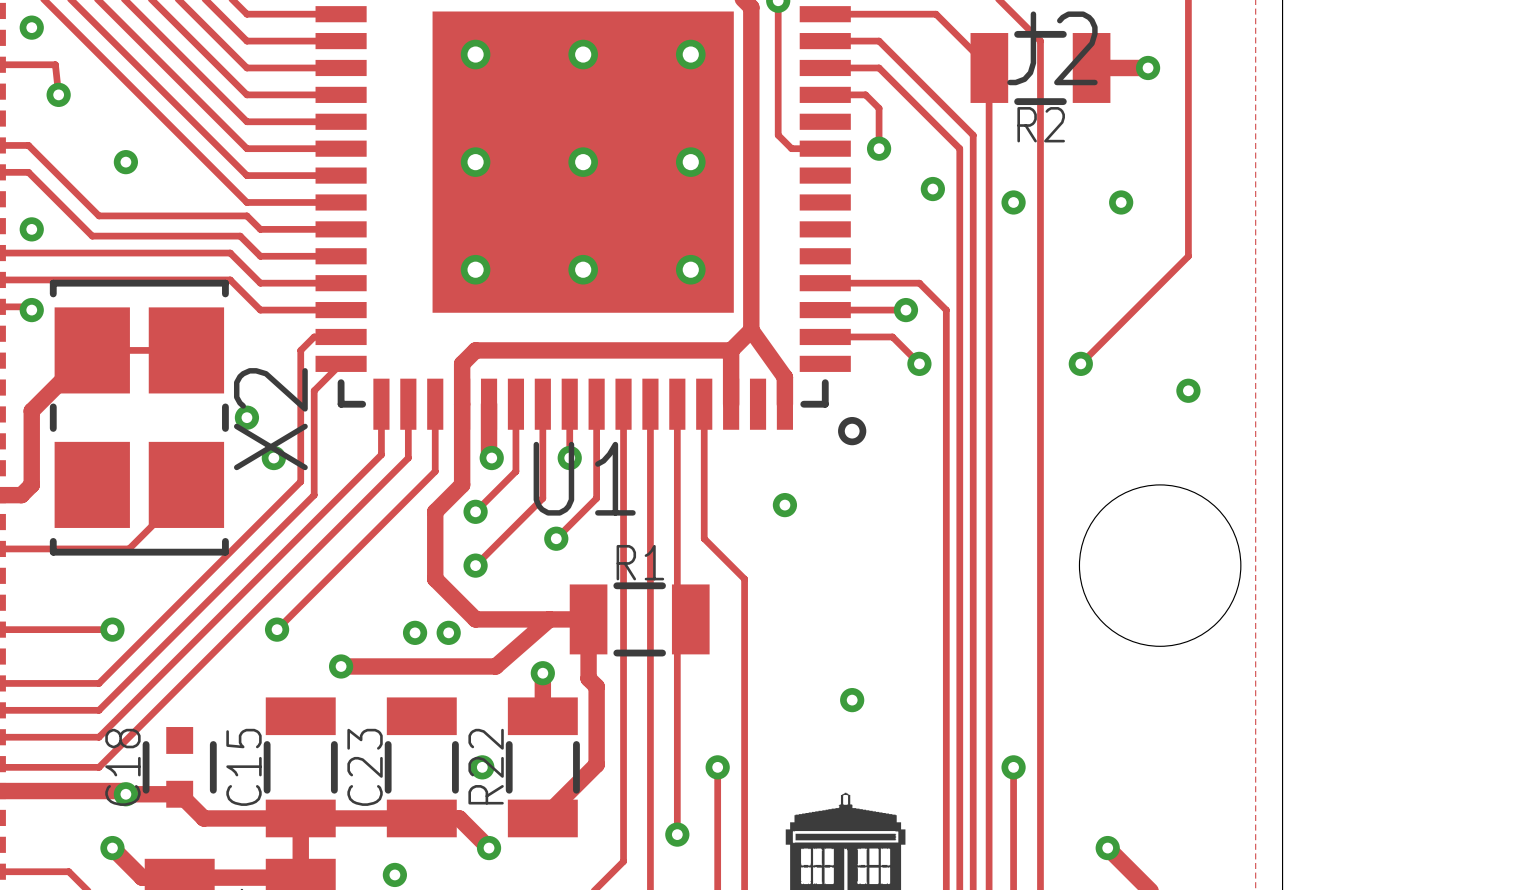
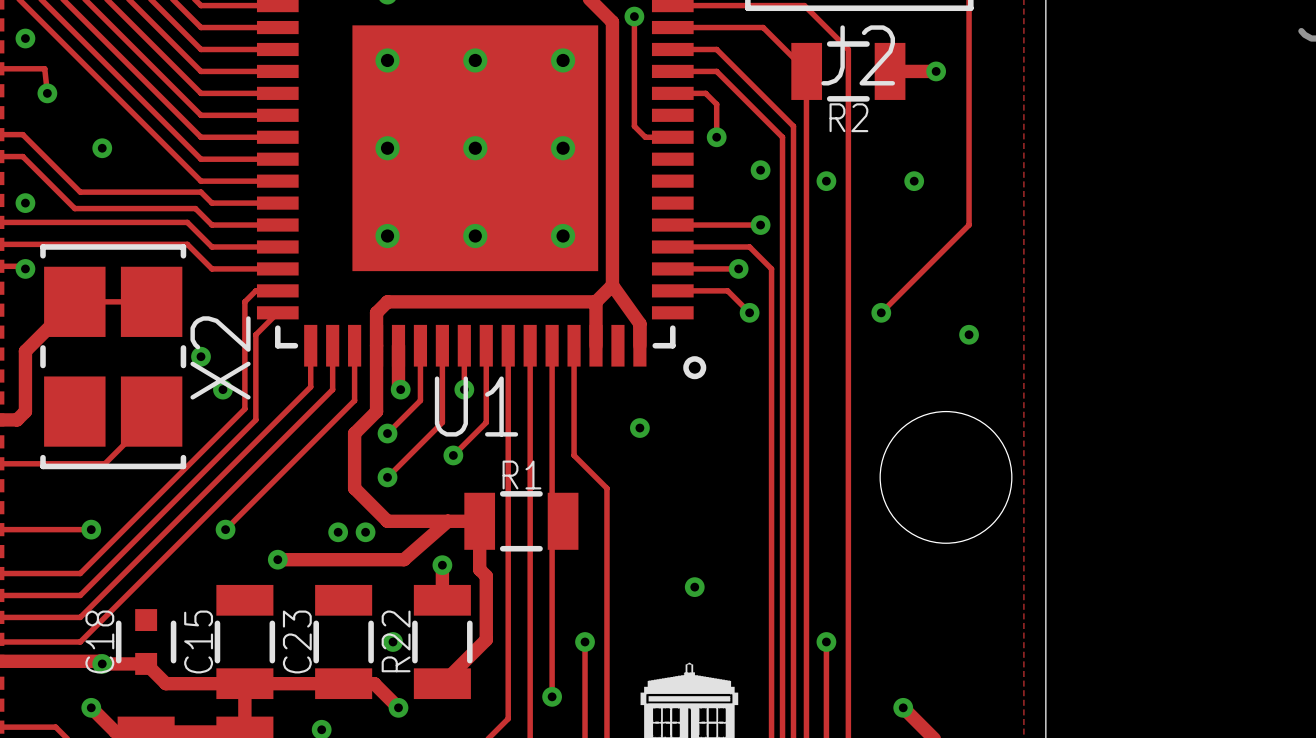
track: none -> (672, 225) (760, 225)
via: none -> (760, 225)

